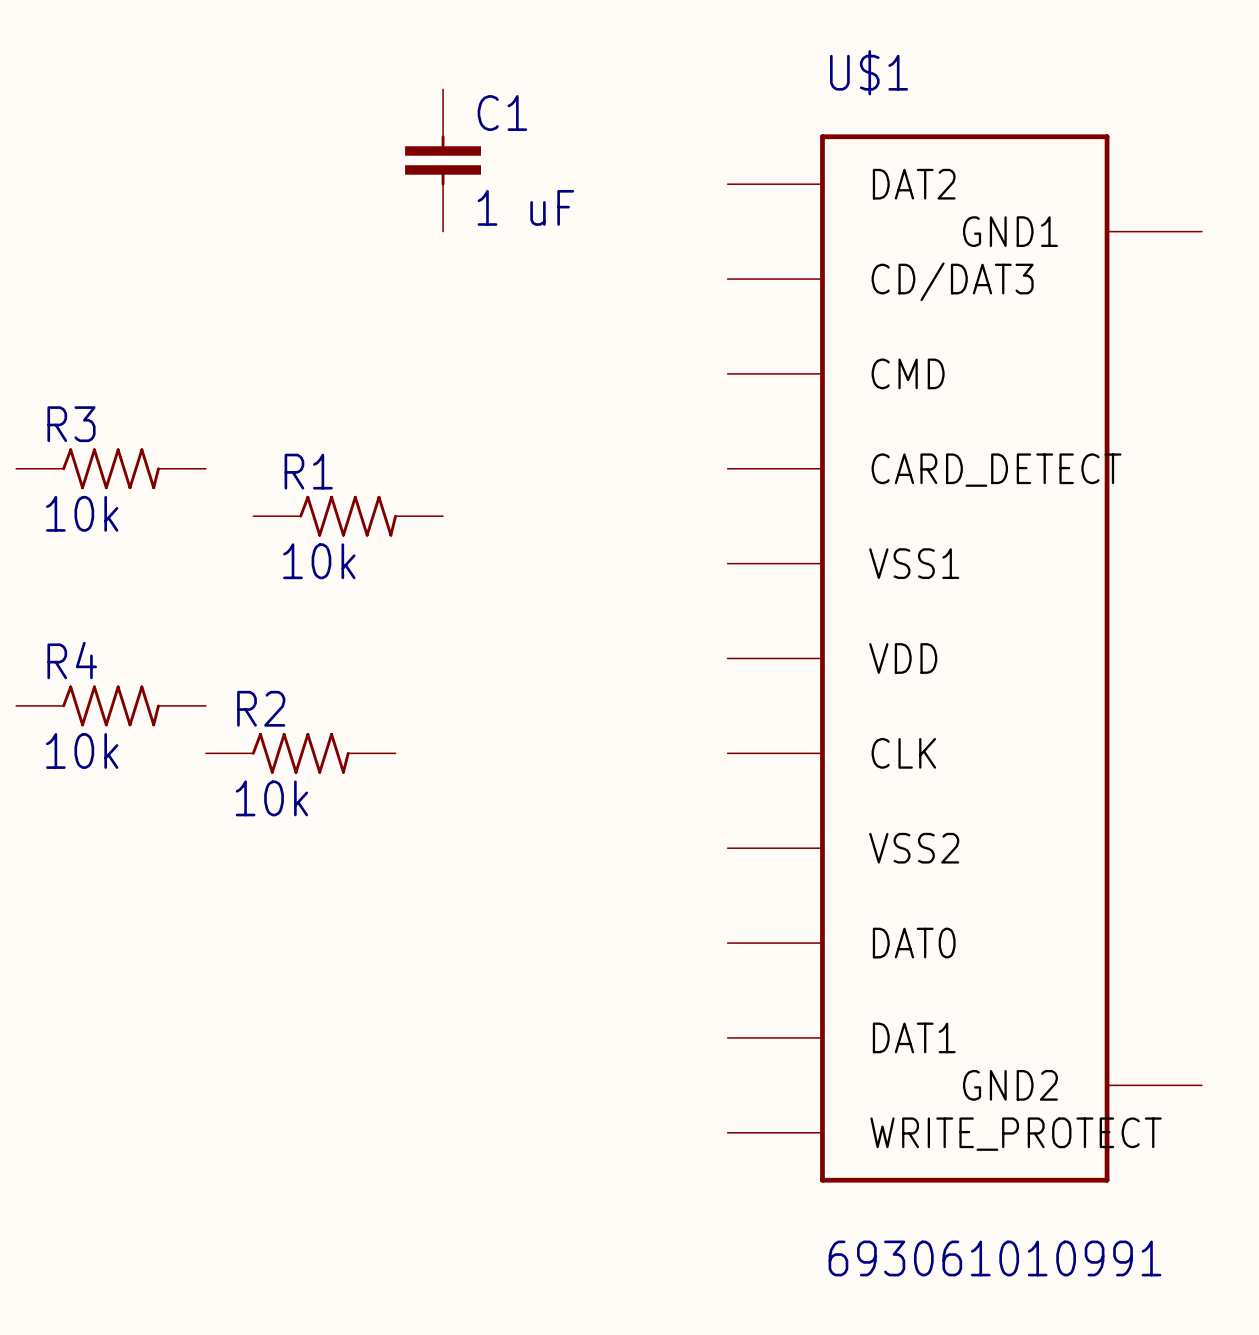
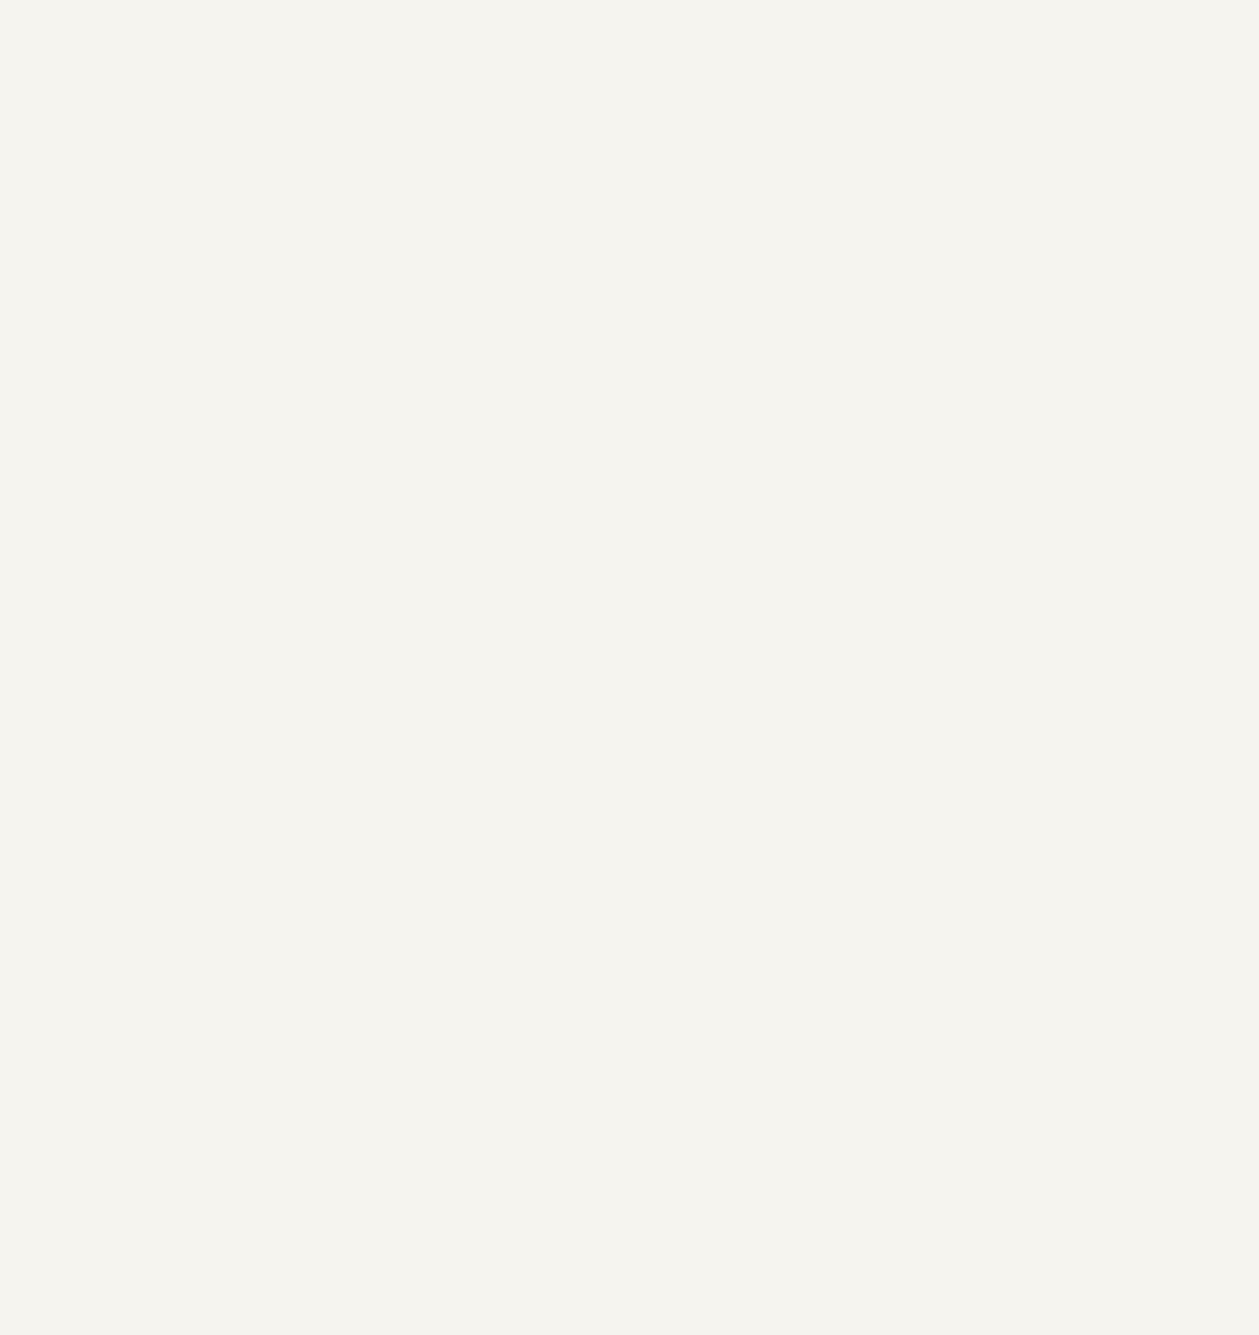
C1: 1 uF (443, 160) -> none
R3: 10k (111, 468) -> none
R1: 10k (348, 516) -> none
U$1: 693061010991 (964, 658) -> none
R4: 10k (111, 705) -> none
R2: 10k (300, 753) -> none

